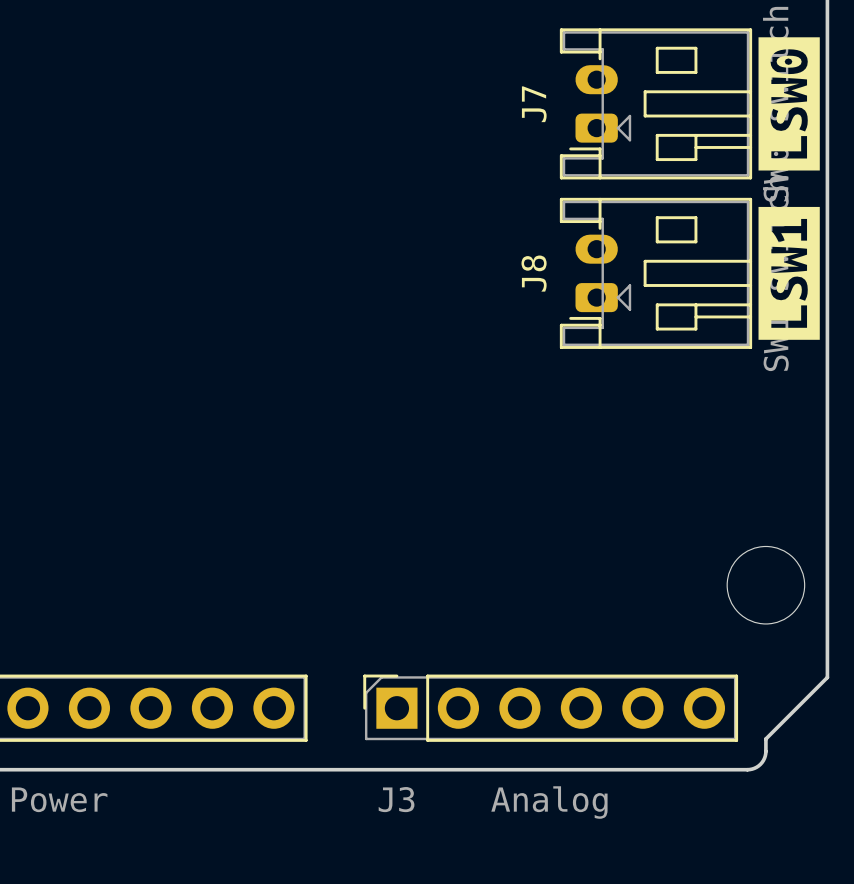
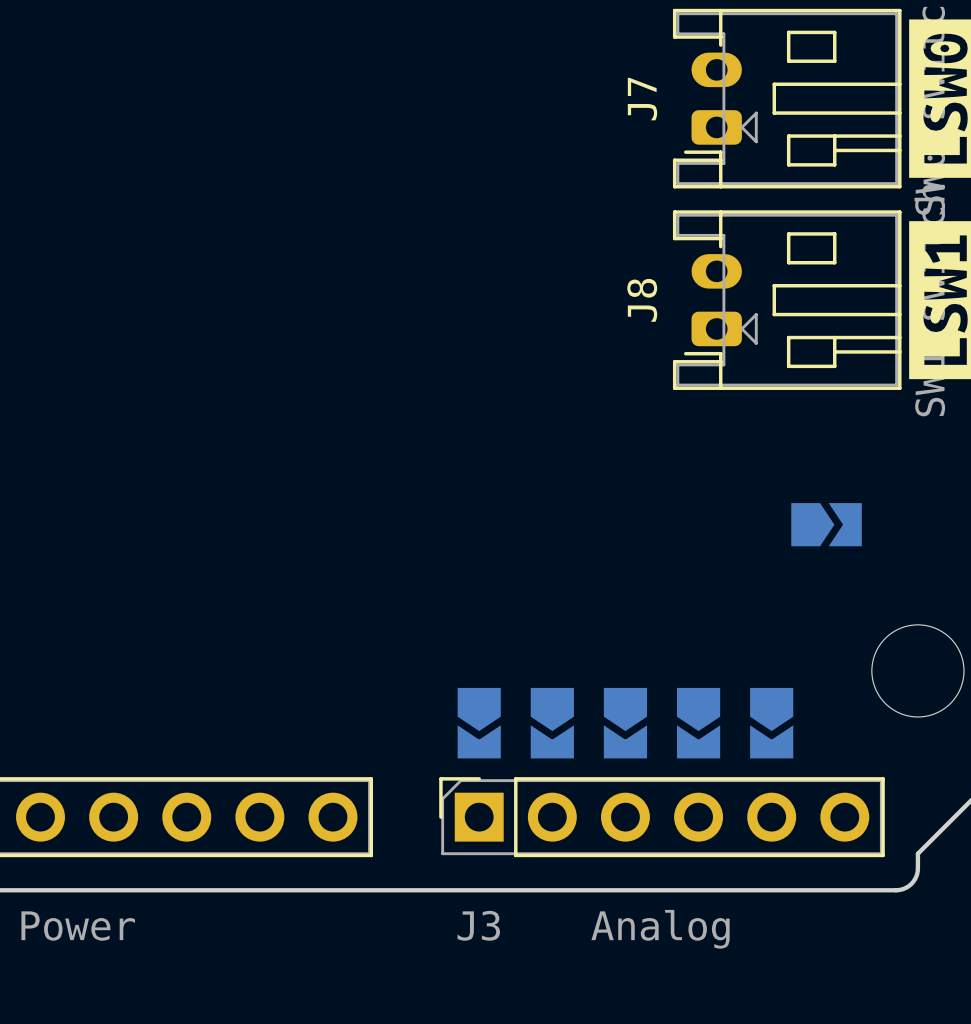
part: none -> (826, 524)
part: none -> (479, 723)
part: none -> (552, 723)
part: none -> (625, 723)
part: none -> (698, 723)
part: none -> (771, 723)

